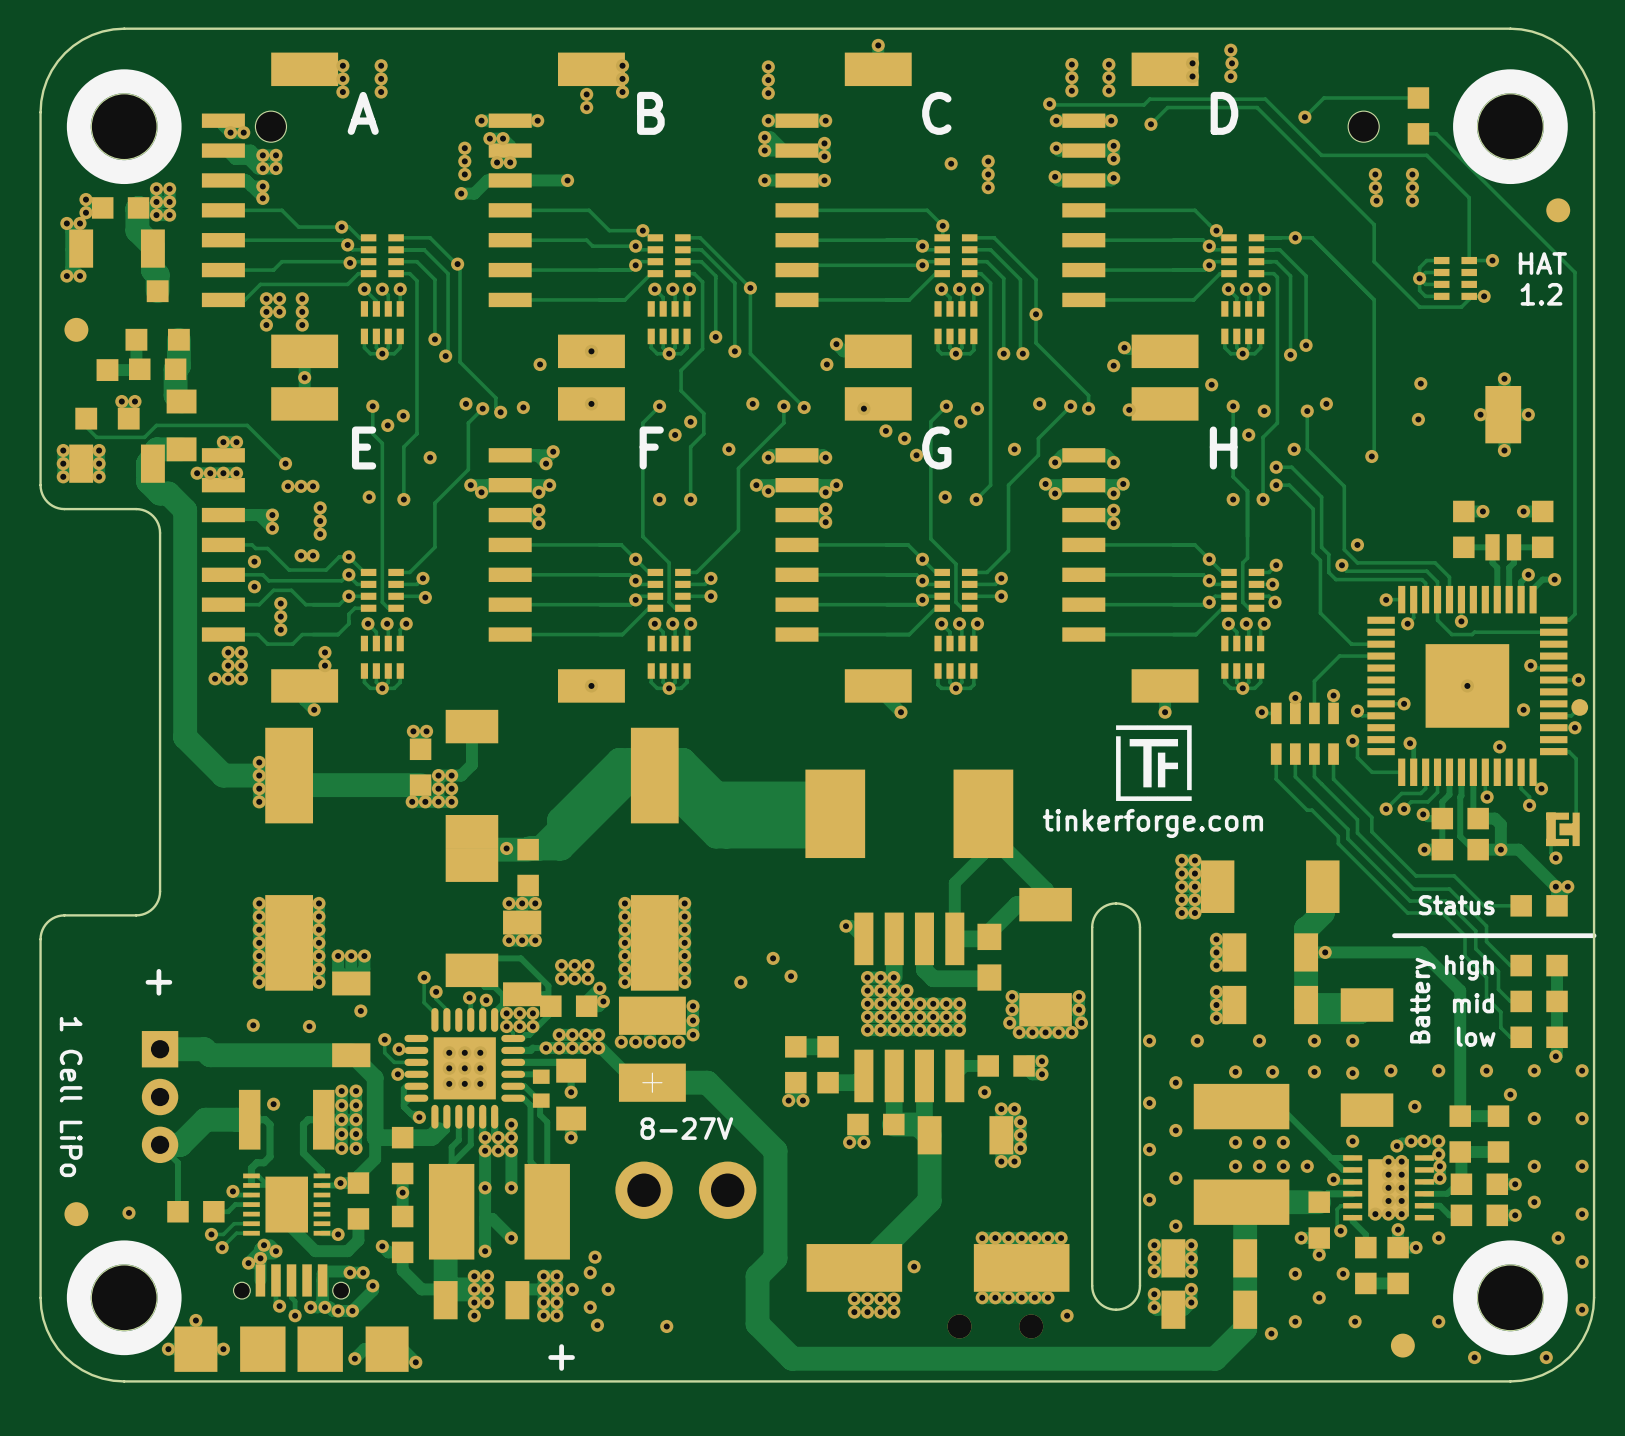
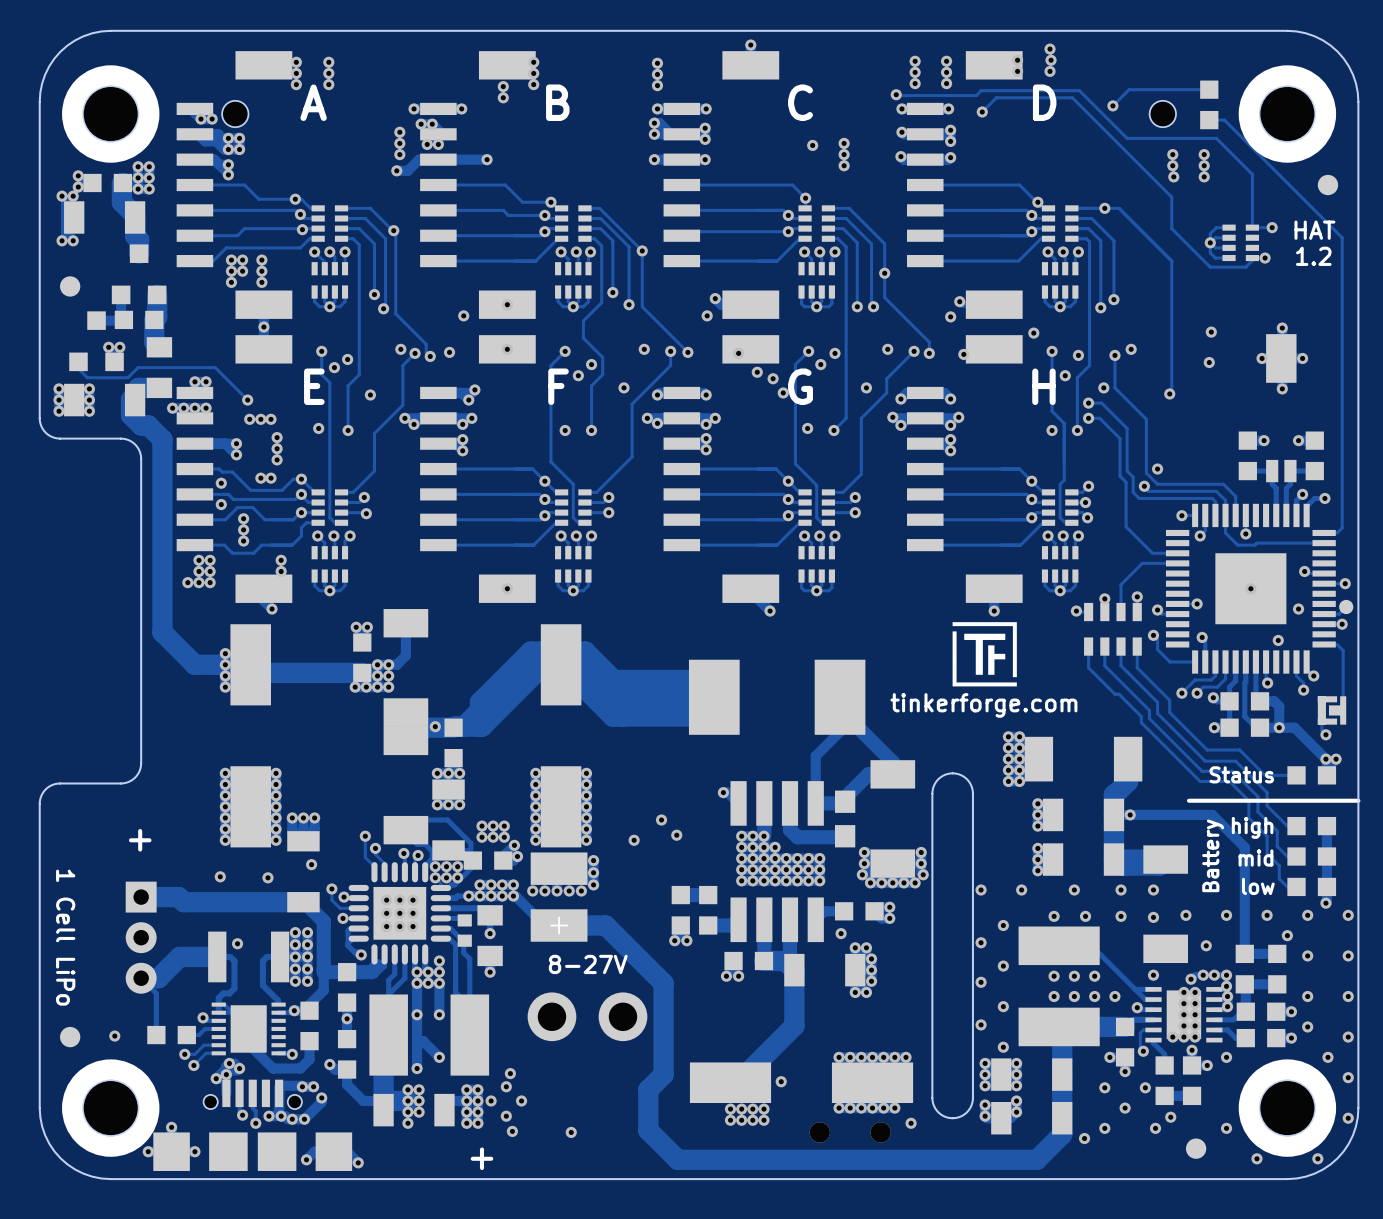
via: none -> (1170, 1117)

